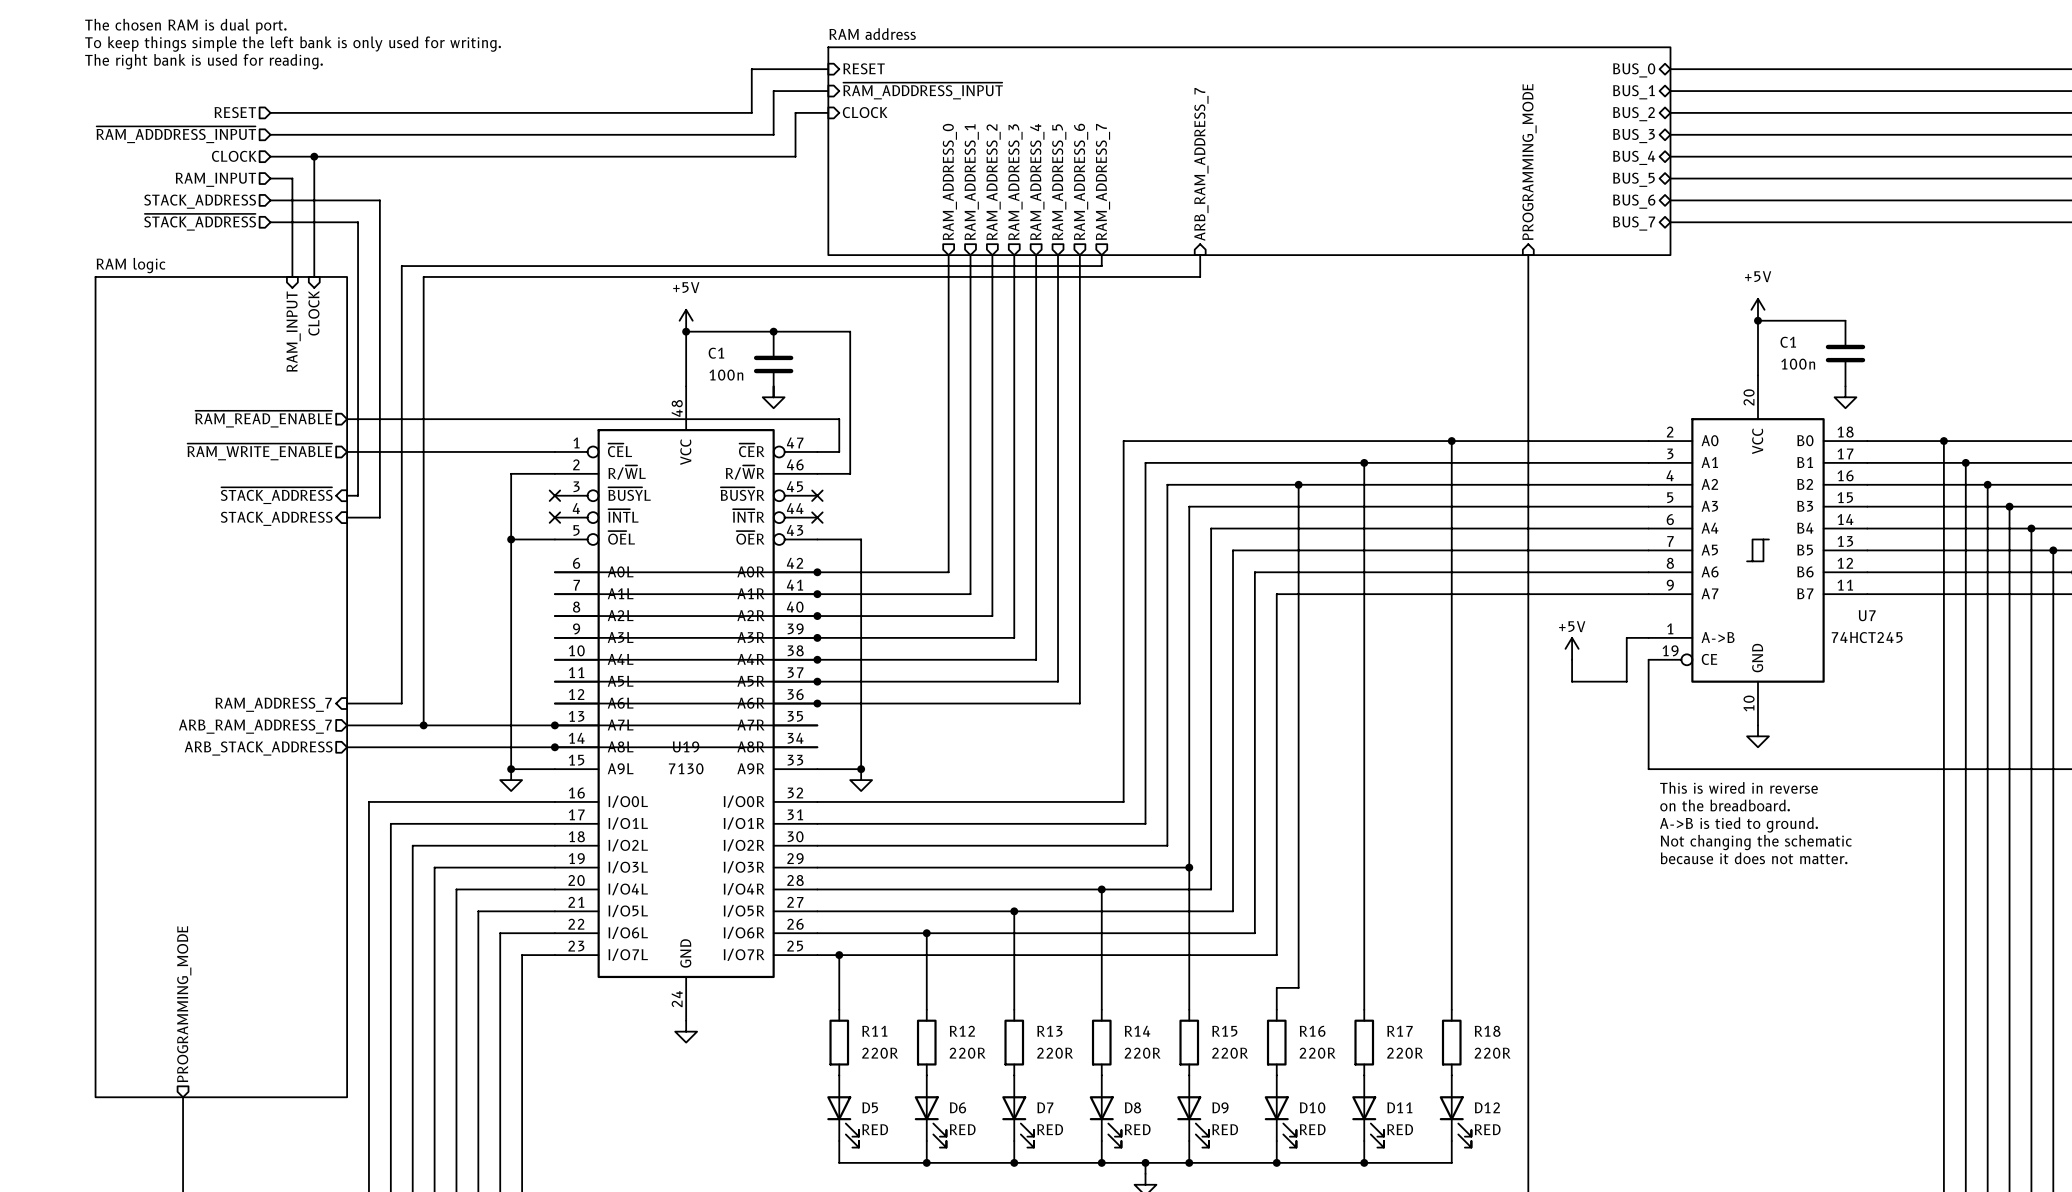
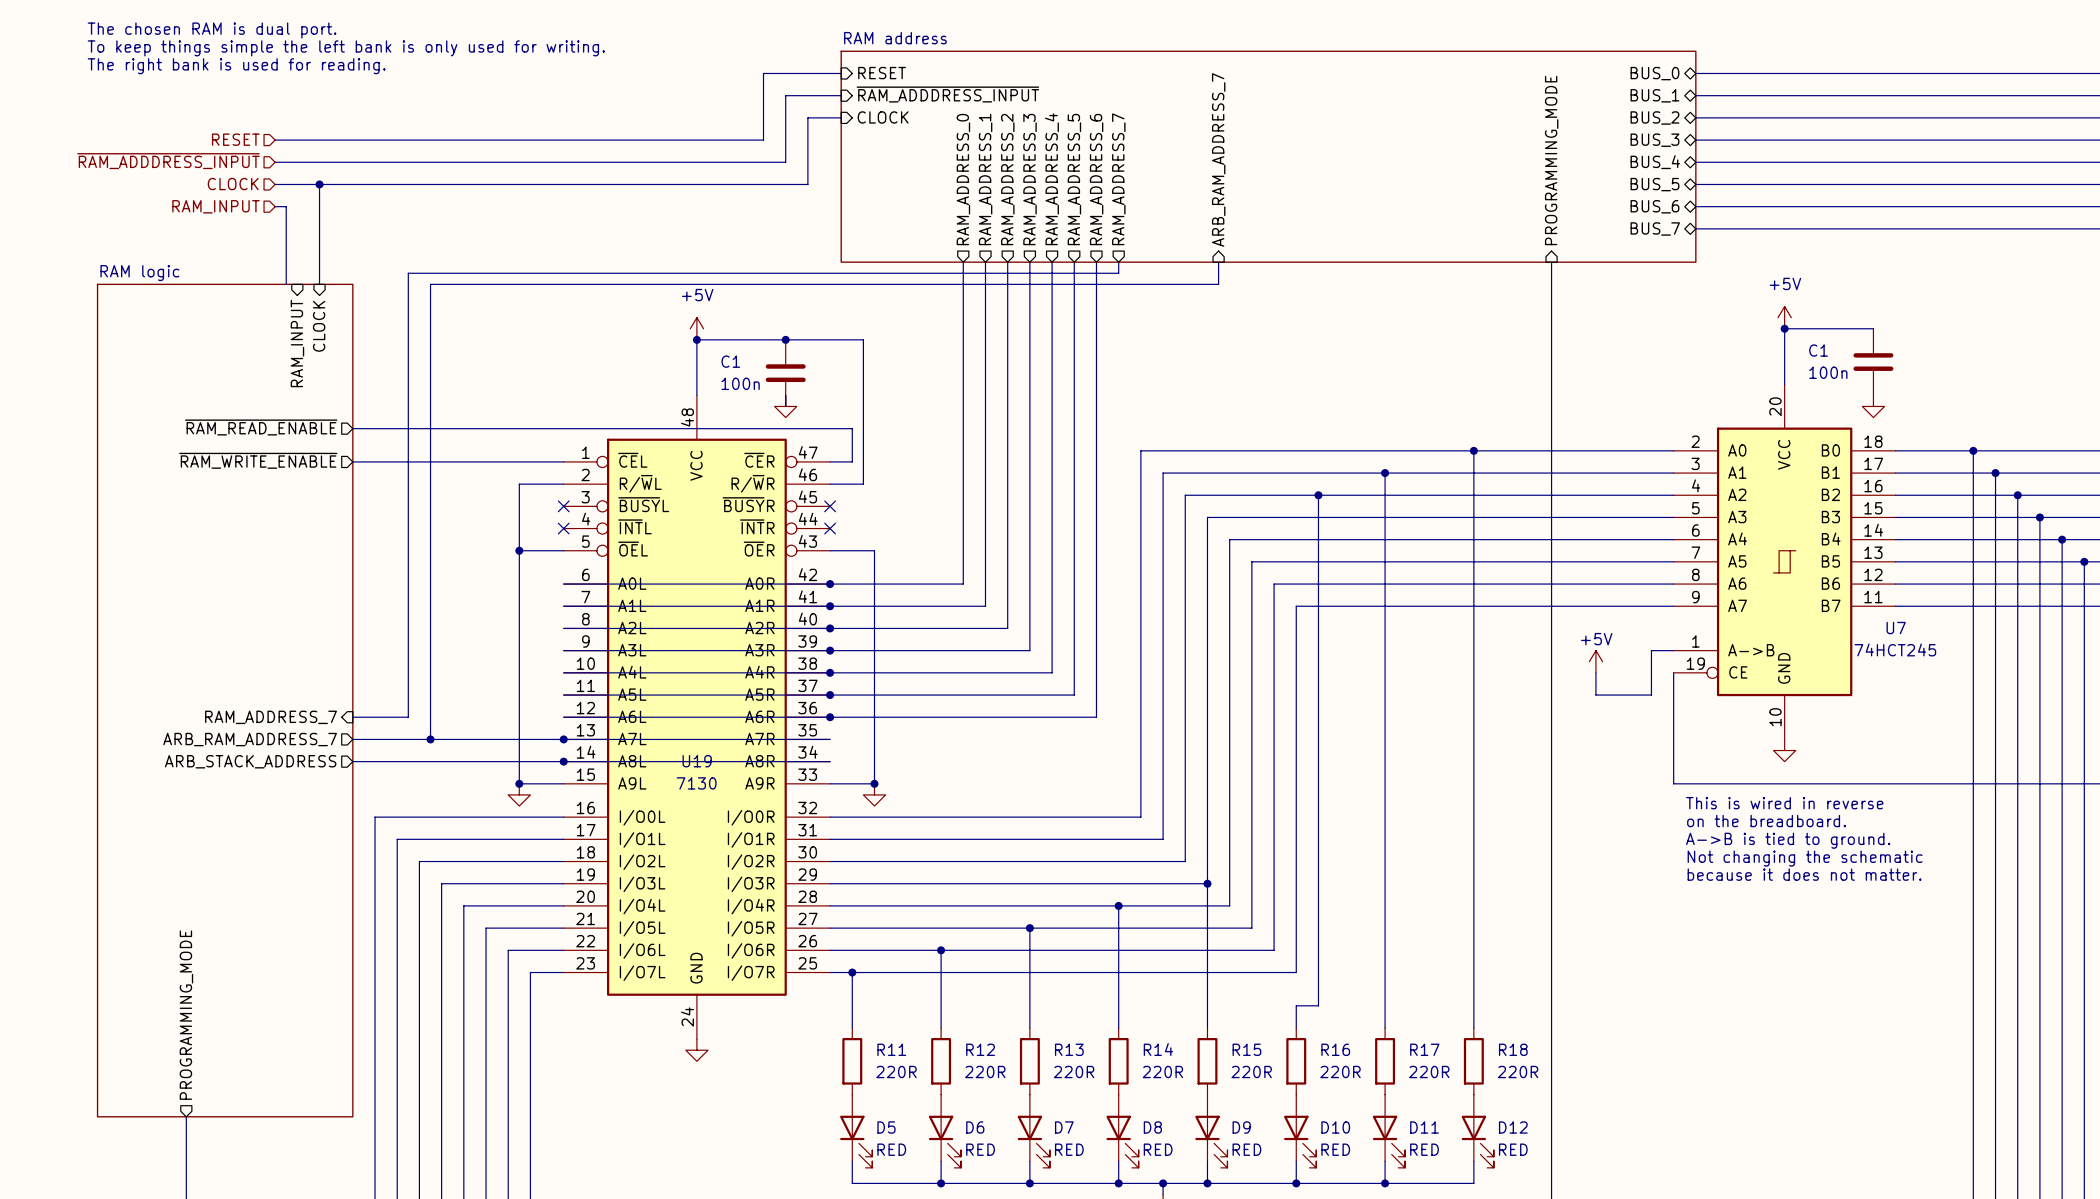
hierarchical label: RESET (235, 112) -> none
wire: (270, 112) (751, 112) -> none
hierarchical label: ~{RAM_ADDDRESS_INPUT} (176, 134) -> RESET (235, 139)
wire: (751, 134) (773, 134) -> (763, 140) (763, 117)
hierarchical label: CLOCK (234, 156) -> ~{RAM_ADDDRESS_INPUT} (168, 161)
wire: (314, 156) (314, 178) -> none
junction position: (314, 156) -> (319, 184)
wire: (773, 156) (795, 156) -> (785, 162) (785, 140)
wire: (292, 178) (292, 276) -> (297, 184) (807, 184) (807, 162)
hierarchical label: RAM_INPUT (215, 179) -> CLOCK (233, 184)
wire: (281, 200) (379, 200) (379, 517) (347, 517) -> (286, 206) (286, 284)
hierarchical label: STACK_ADDRESS (200, 201) -> RAM_INPUT (216, 206)
hierarchical label: ~{STACK_ADDRESS} (200, 222) -> none
wire: (270, 222) (358, 222) (358, 495) (347, 495) -> none
sheet pin: ~{STACK_ADDRESS} (276, 495) -> none
sheet pin: STACK_ADDRESS (276, 518) -> none

